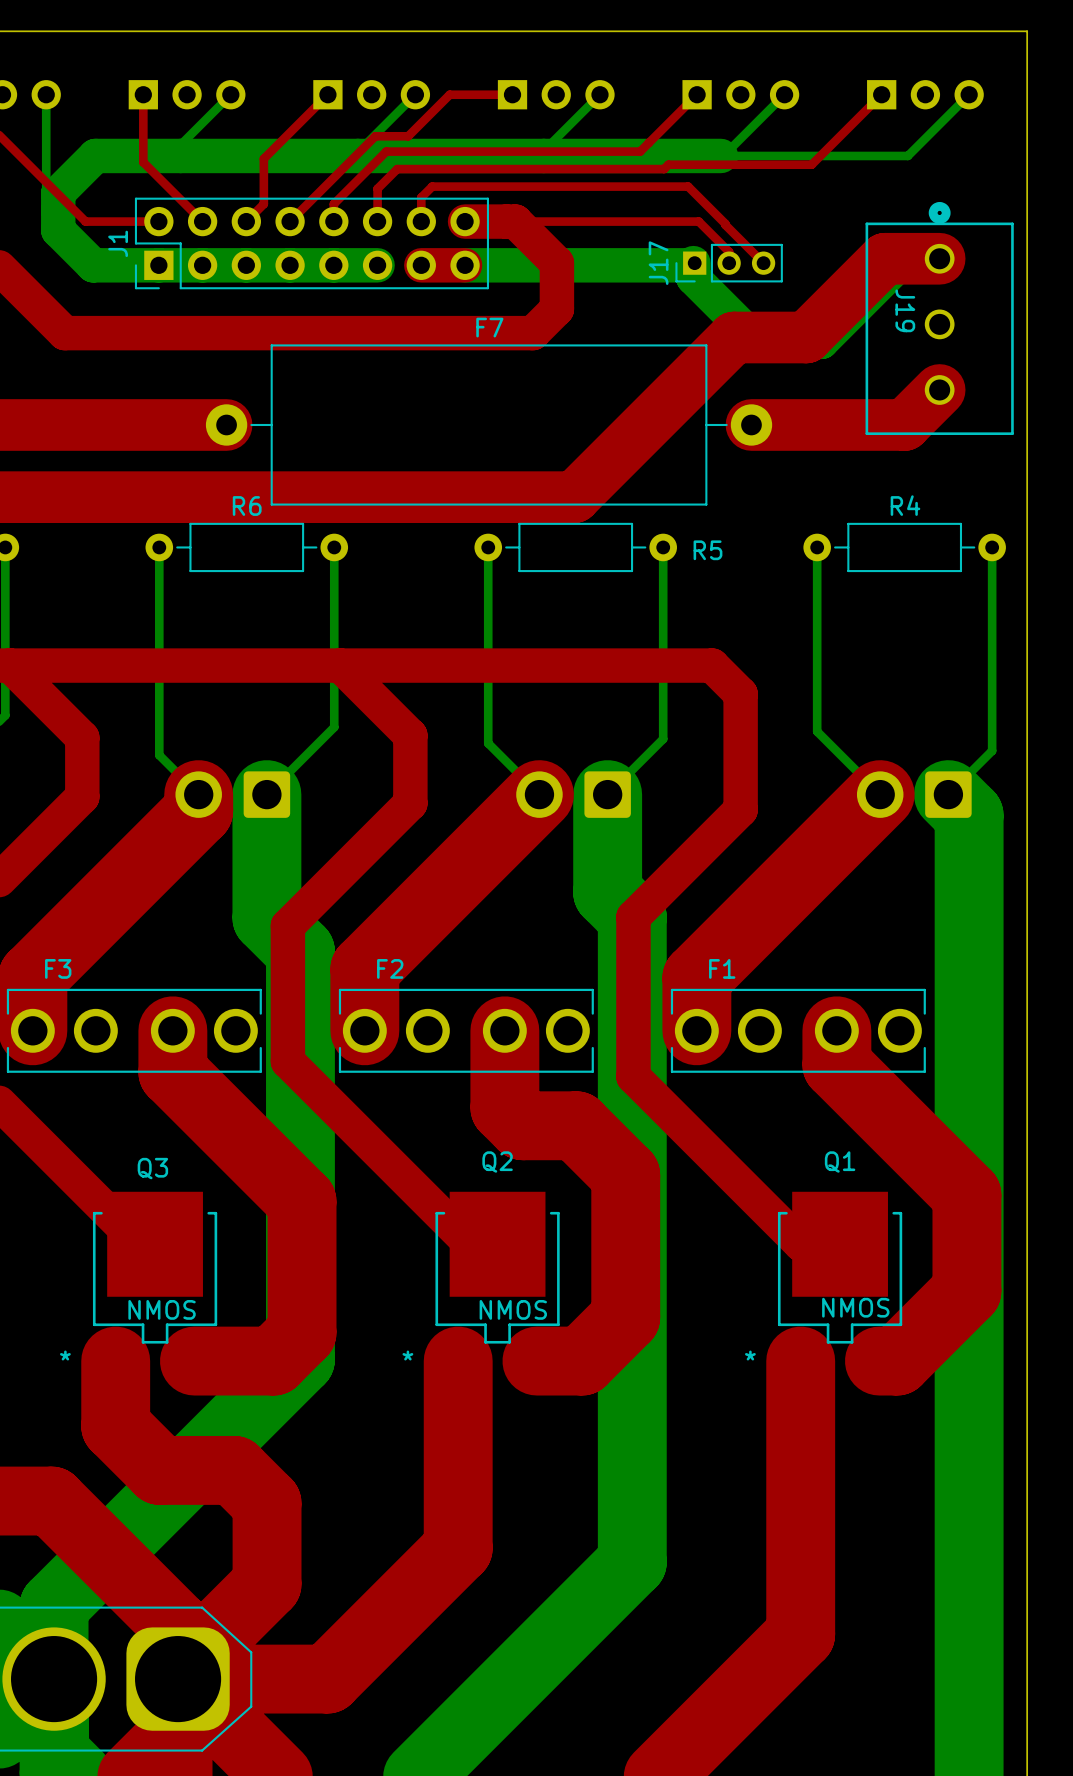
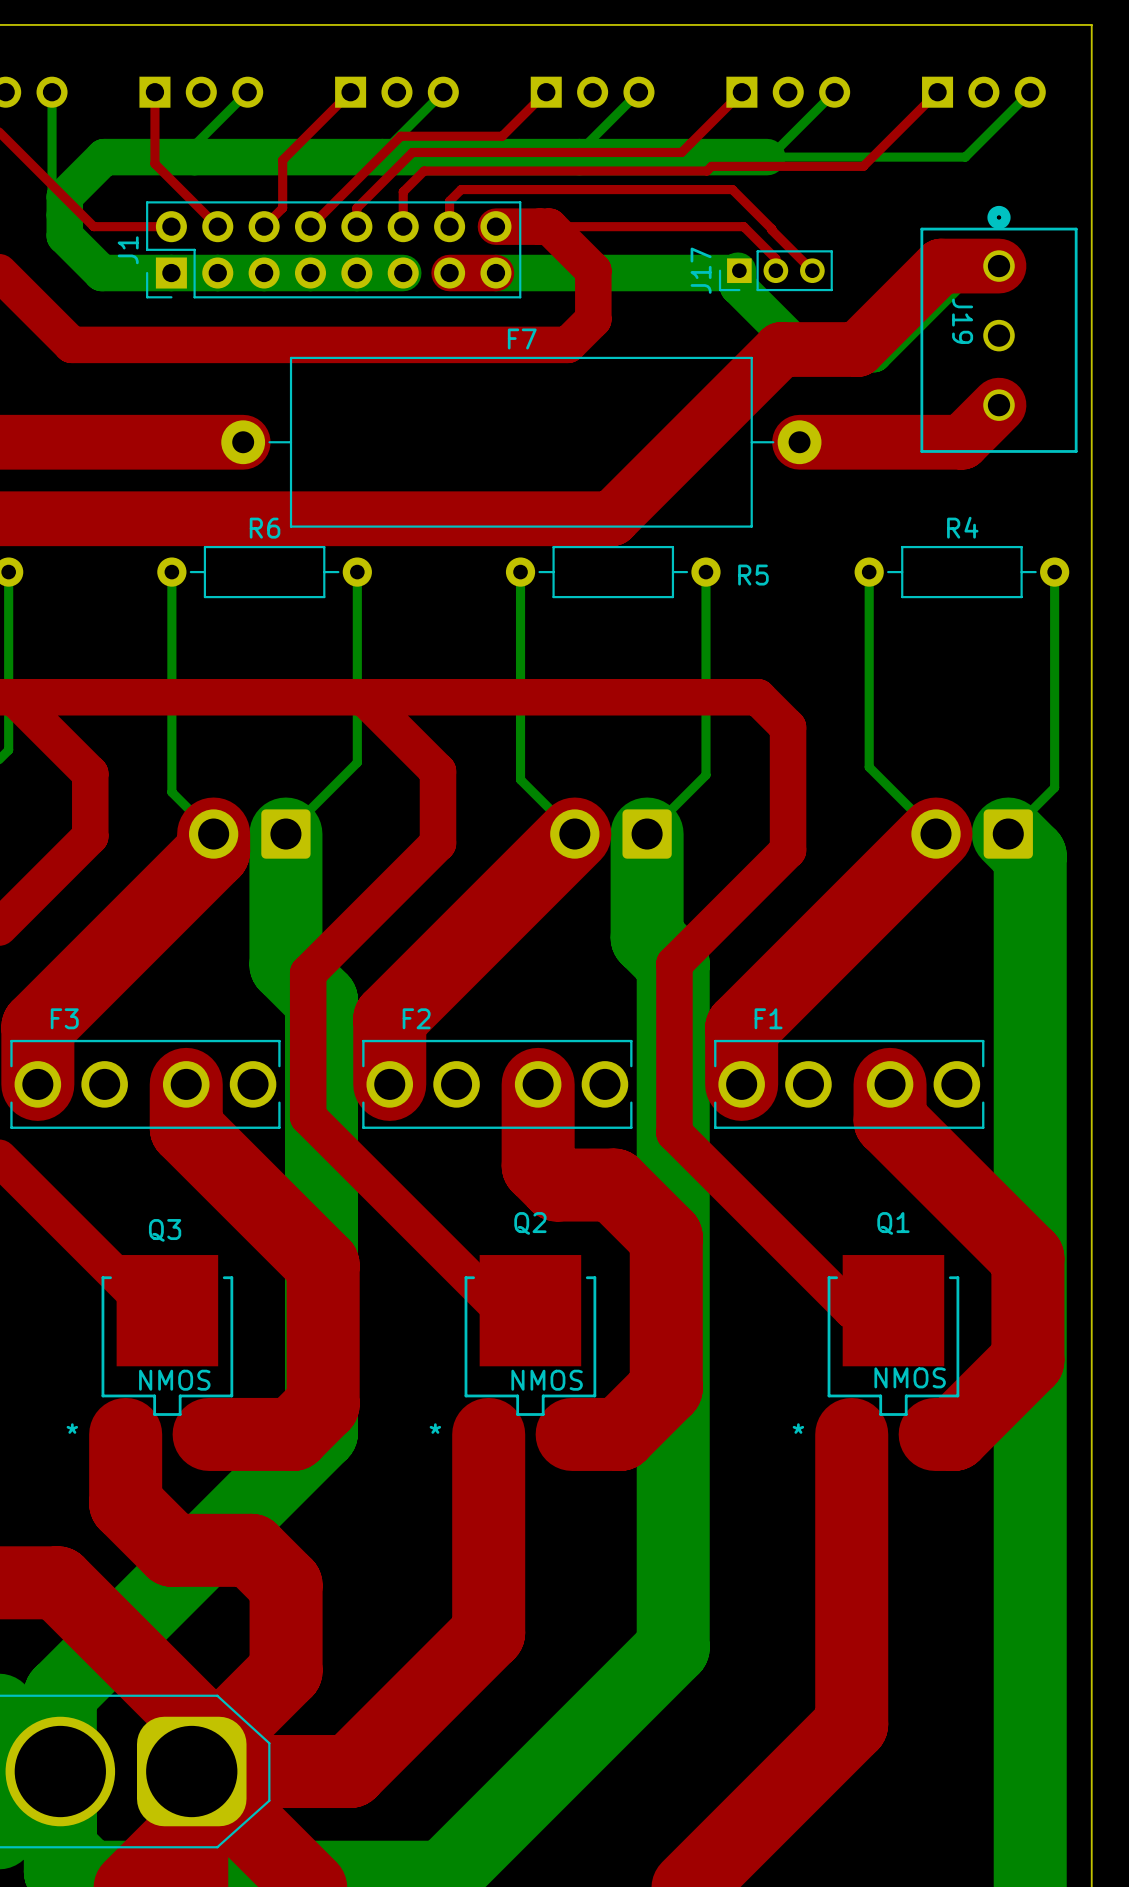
top track: (512, 94) (449, 94) (408, 136) -> (546, 92) (502, 136) (435, 136)

